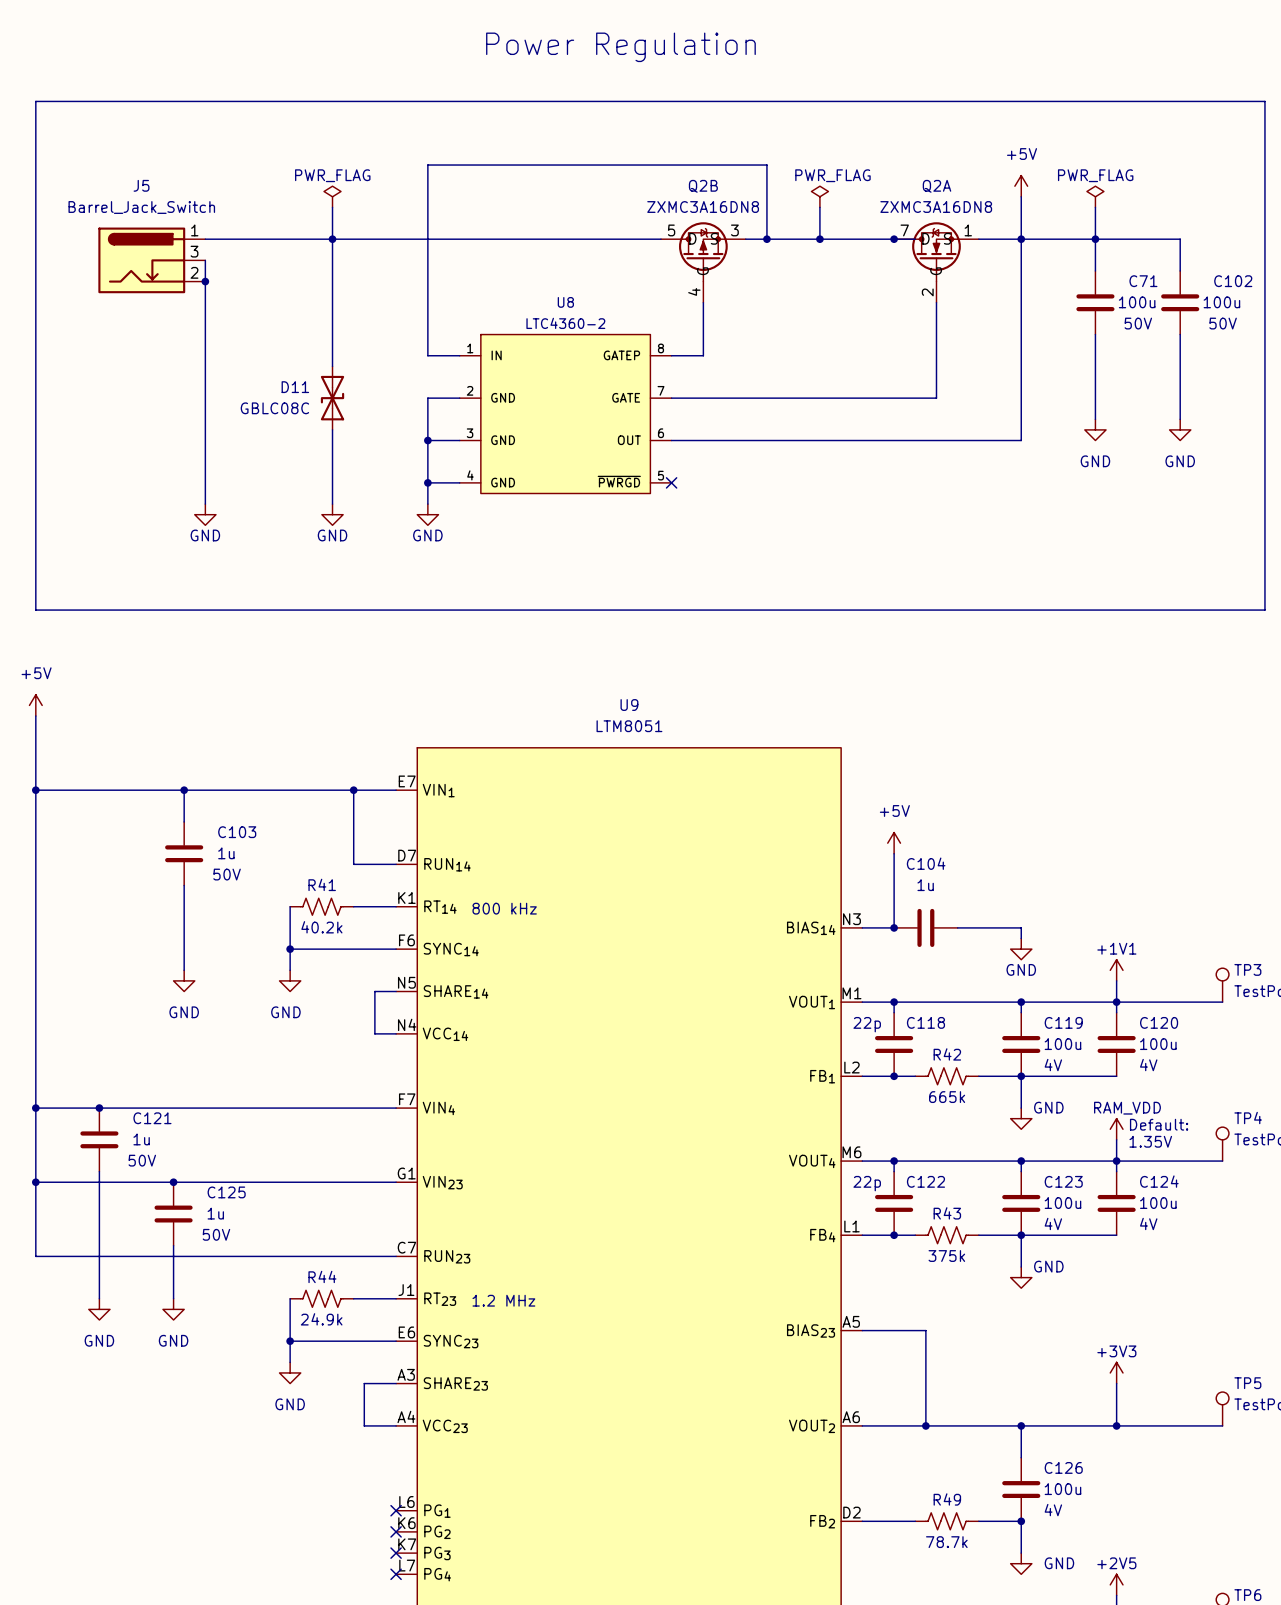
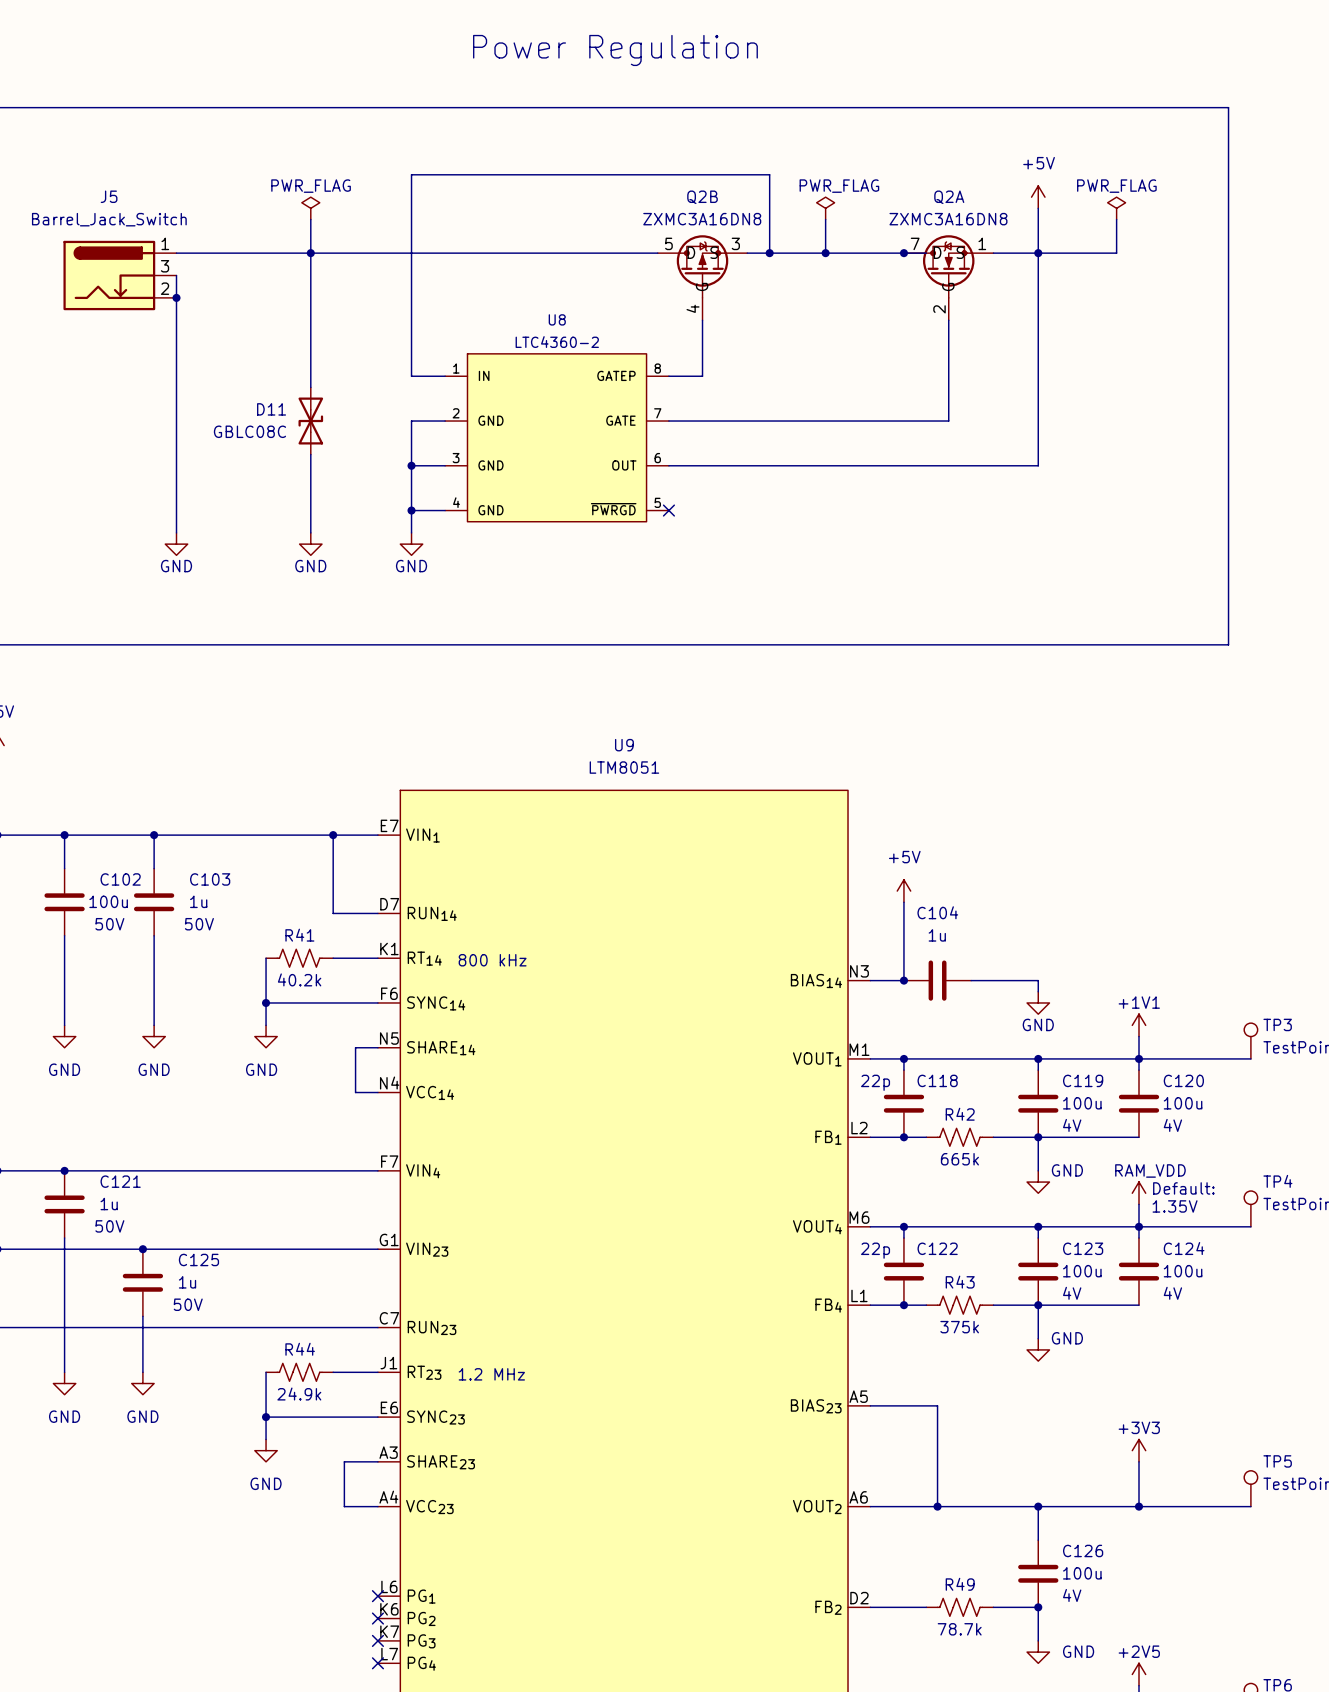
line: (1201, 101) (1264, 101) (1264, 610) (1201, 610) -> (1228, 107) (1228, 644)
junction: (1095, 239) -> none
wire: (1095, 270) (1095, 239) (1180, 239) (1180, 270) -> none
C71: 100u (1095, 302) -> none
C102 position: (1180, 302) -> (64, 902)
wire: (1095, 334) (1095, 419) -> none
wire: (1180, 334) (1180, 419) -> none
power symbol: GND (1095, 429) -> none
power symbol: GND (1180, 429) -> none
wire: none -> (64, 835) (64, 868)
junction: none -> (64, 835)
wire: none -> (64, 935) (64, 1025)
power symbol: none -> GND (64, 1036)

